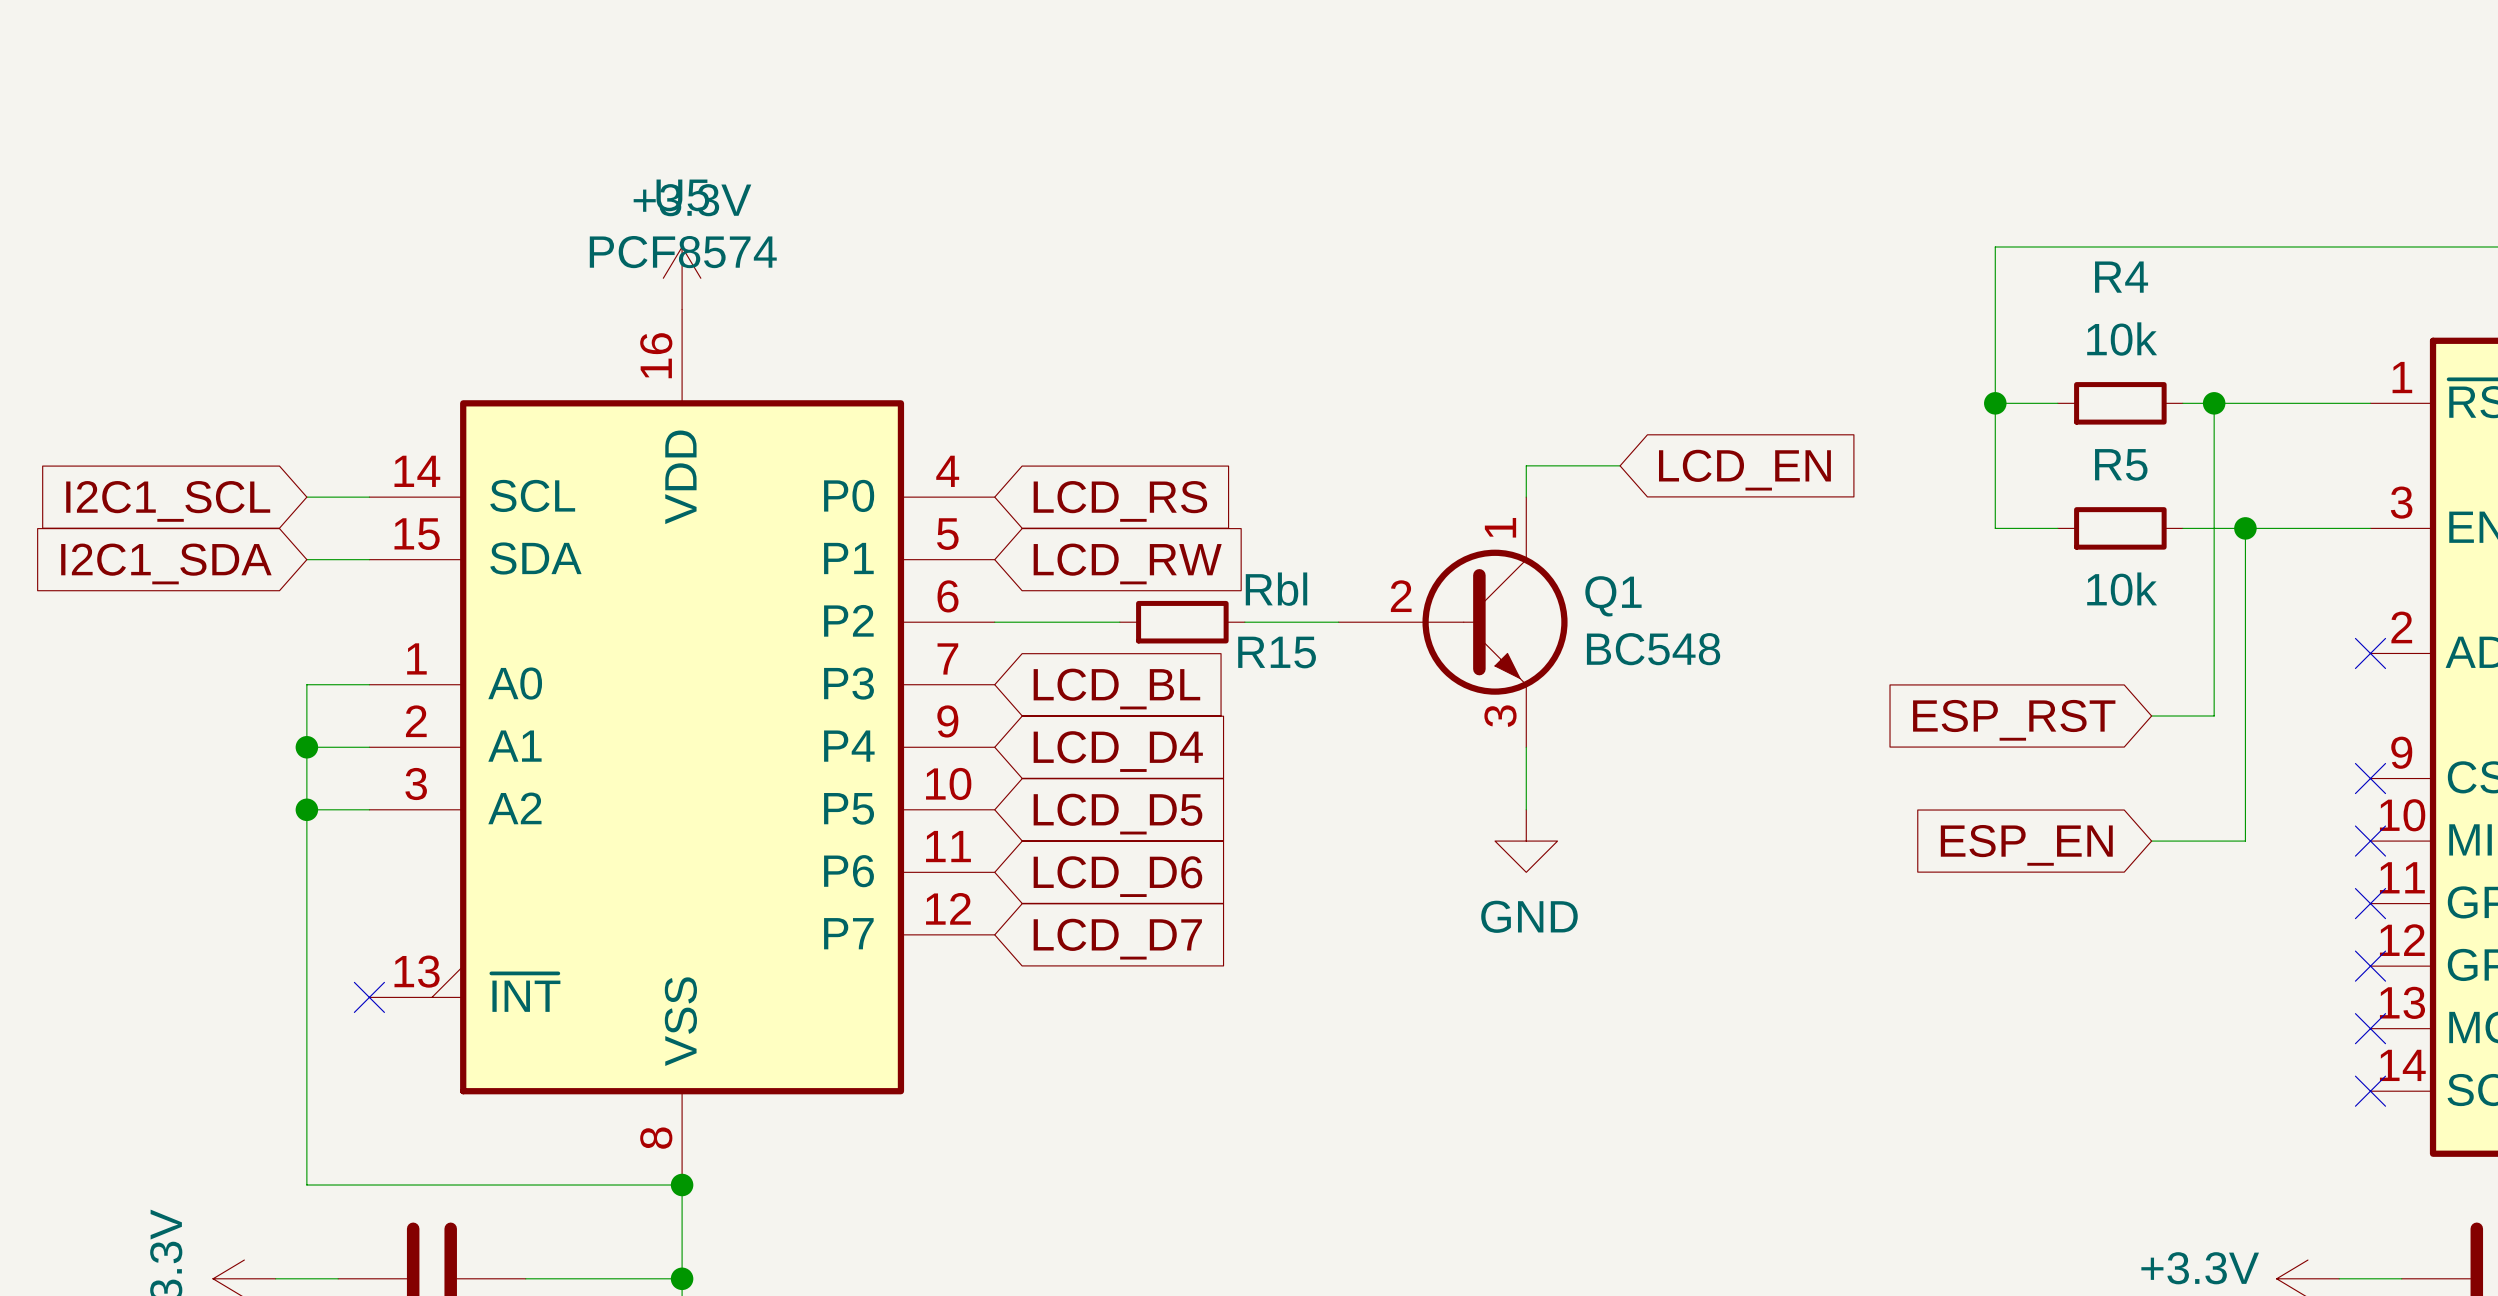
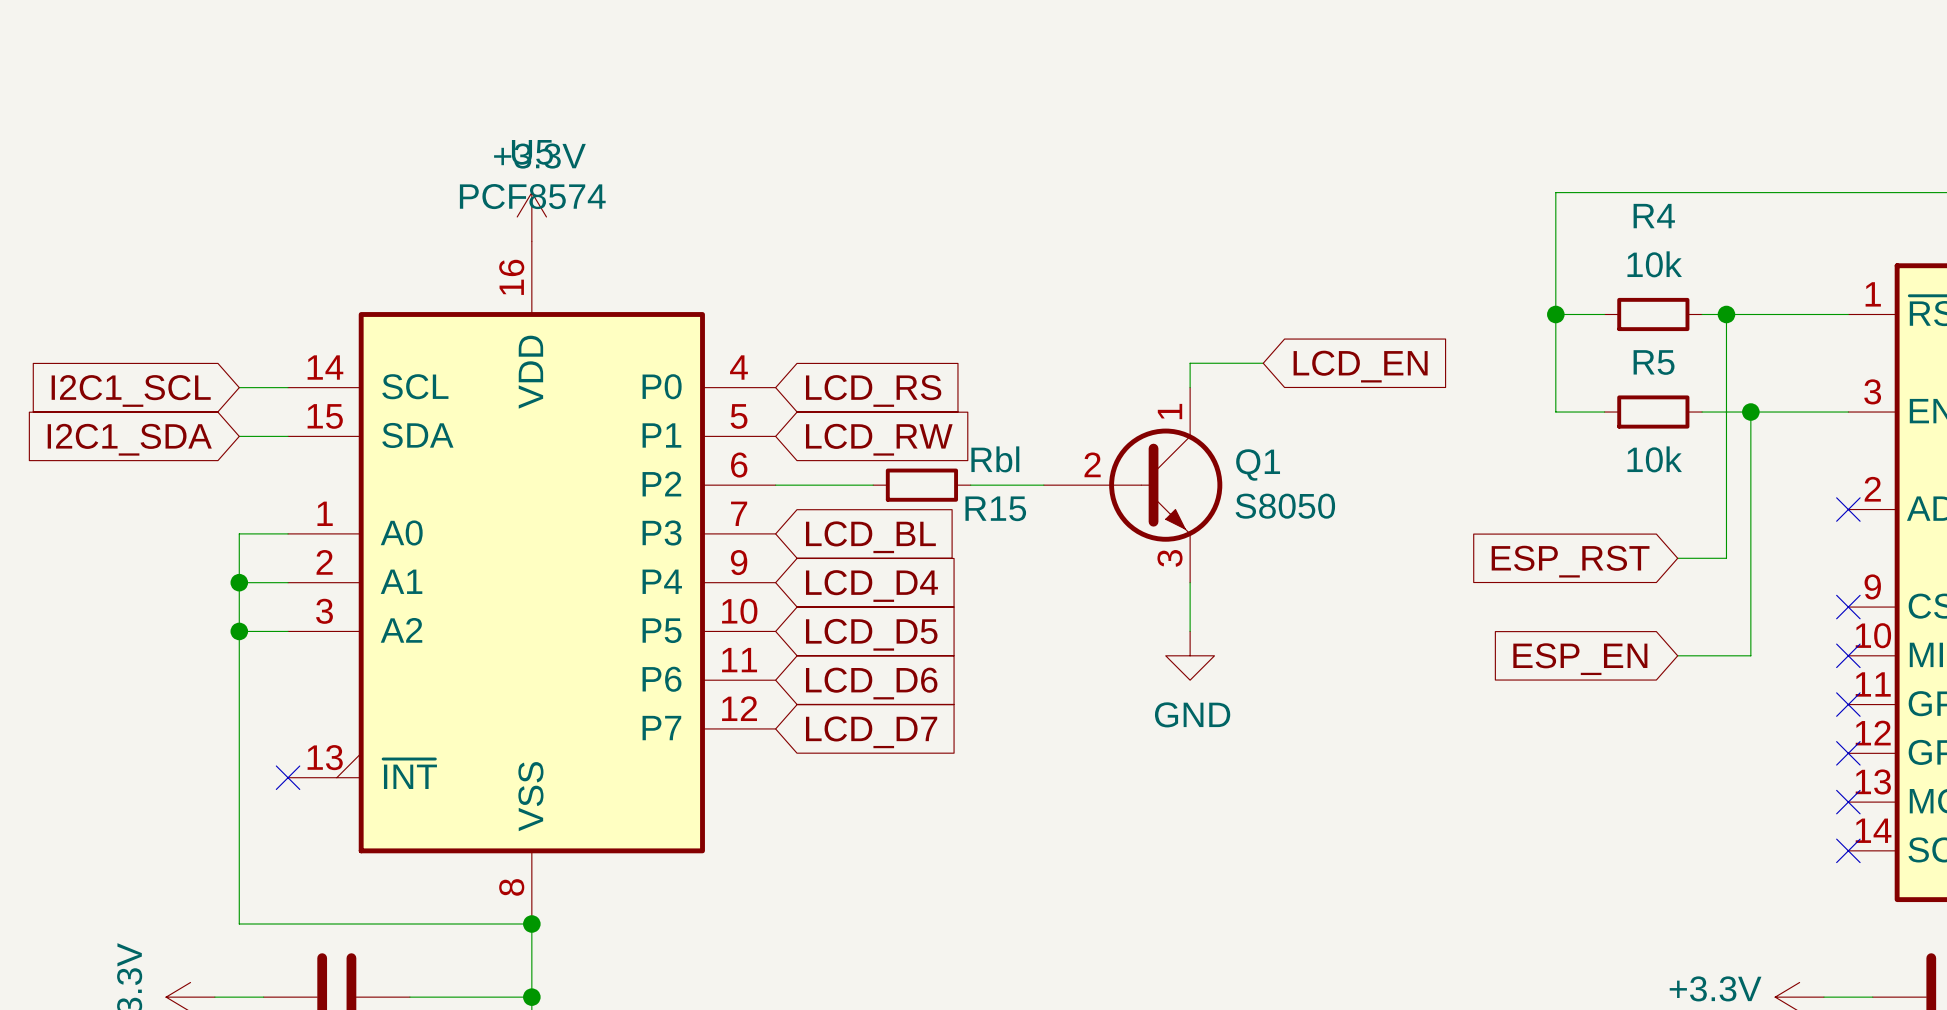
Q1 value: BC548 (1653, 649) -> S8050 (1285, 506)

